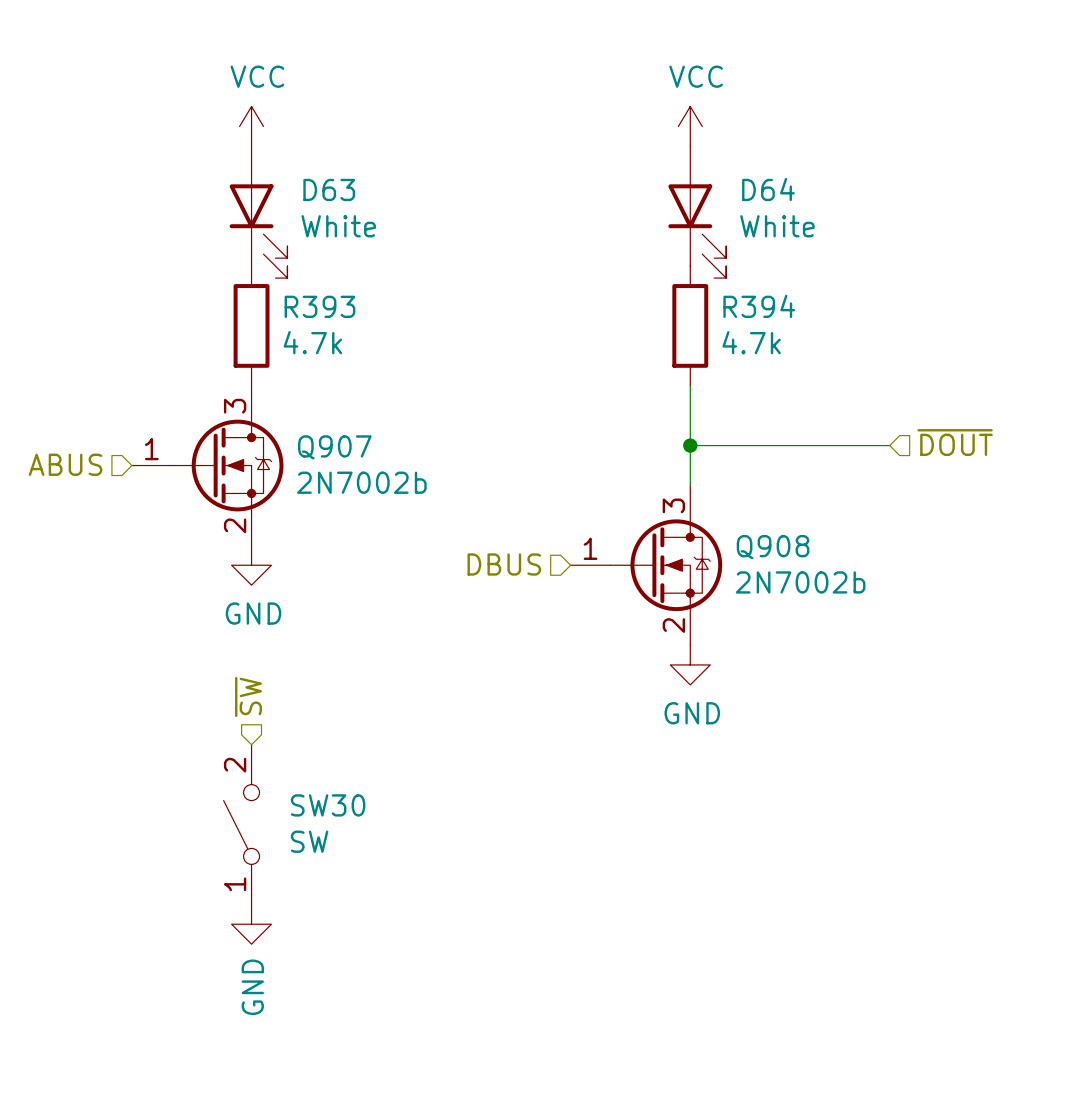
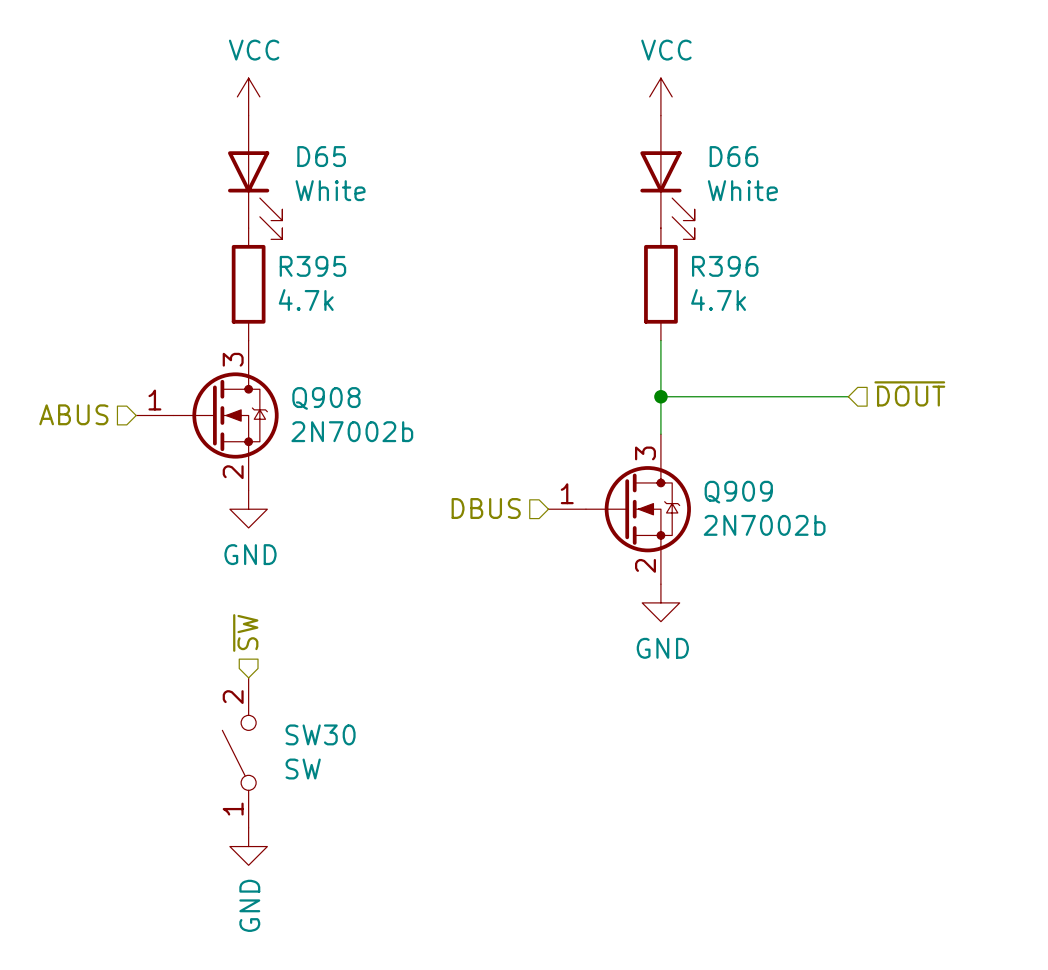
D63 name: D63 (329, 189) -> D65 (321, 156)
D64 name: D64 (768, 189) -> D66 (733, 156)
R393 name: R393 (319, 306) -> R395 (312, 266)
R394 name: R394 (759, 306) -> R396 (725, 266)
Q907 name: Q907 (334, 447) -> Q908 (326, 398)
Q908 name: Q908 (773, 547) -> Q909 (738, 492)

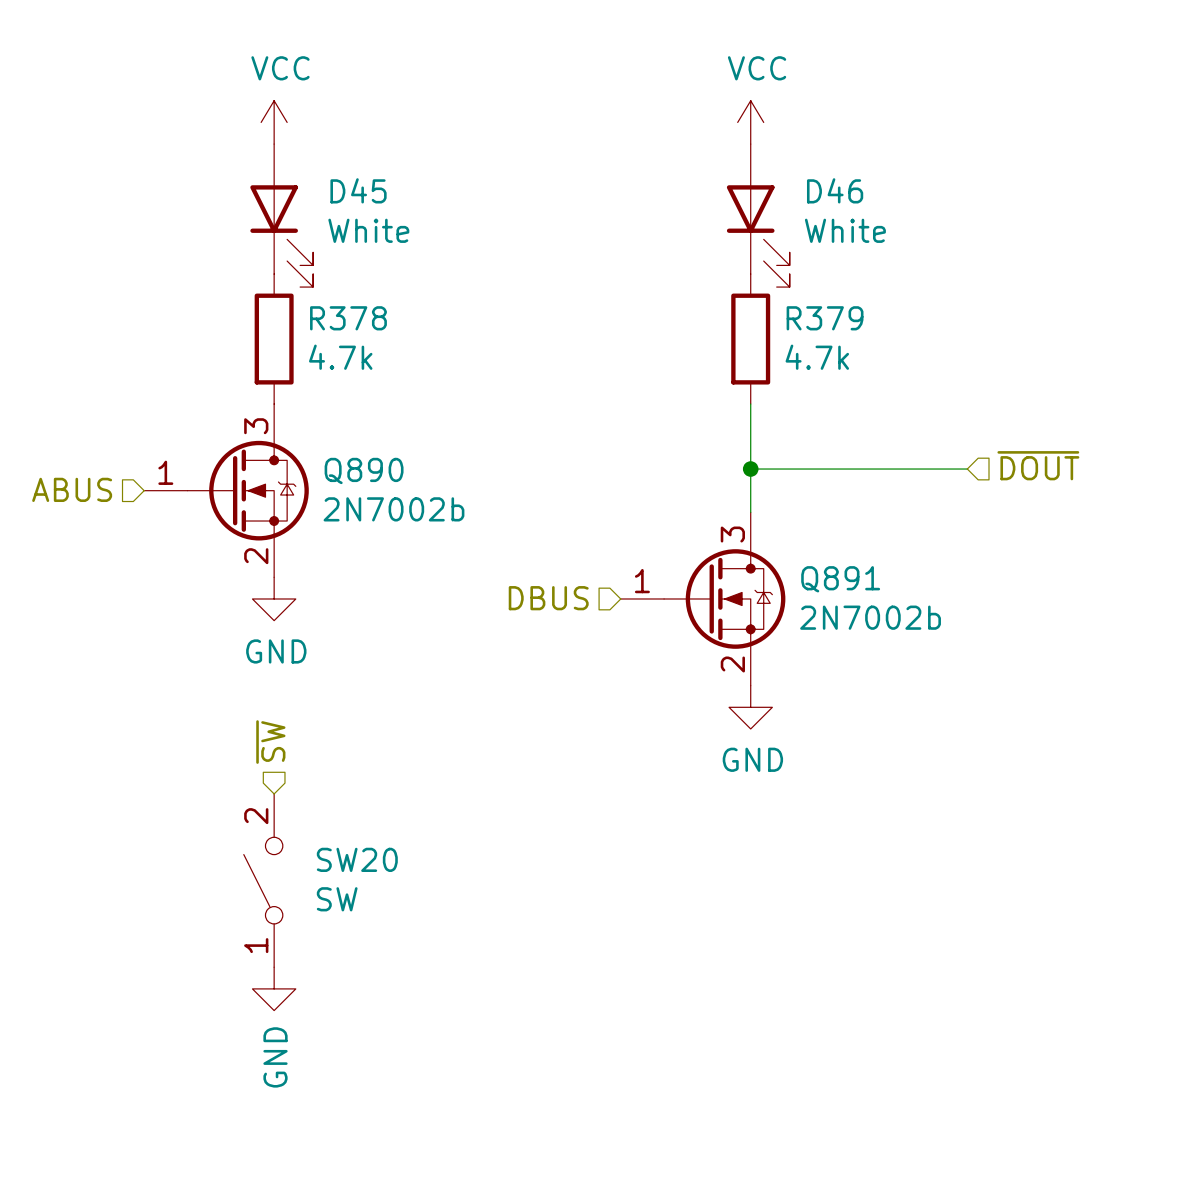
D65 name: D65 (321, 156) -> D45 (358, 190)
D66 name: D66 (733, 156) -> D46 (835, 190)
R395 name: R395 (312, 266) -> R378 (348, 318)
R396 name: R396 (725, 266) -> R379 (825, 318)
Q908 name: Q908 (326, 398) -> Q890 (364, 470)
Q909 name: Q909 (738, 492) -> Q891 (840, 579)
SW30 name: SW30 (320, 734) -> SW20 (357, 859)

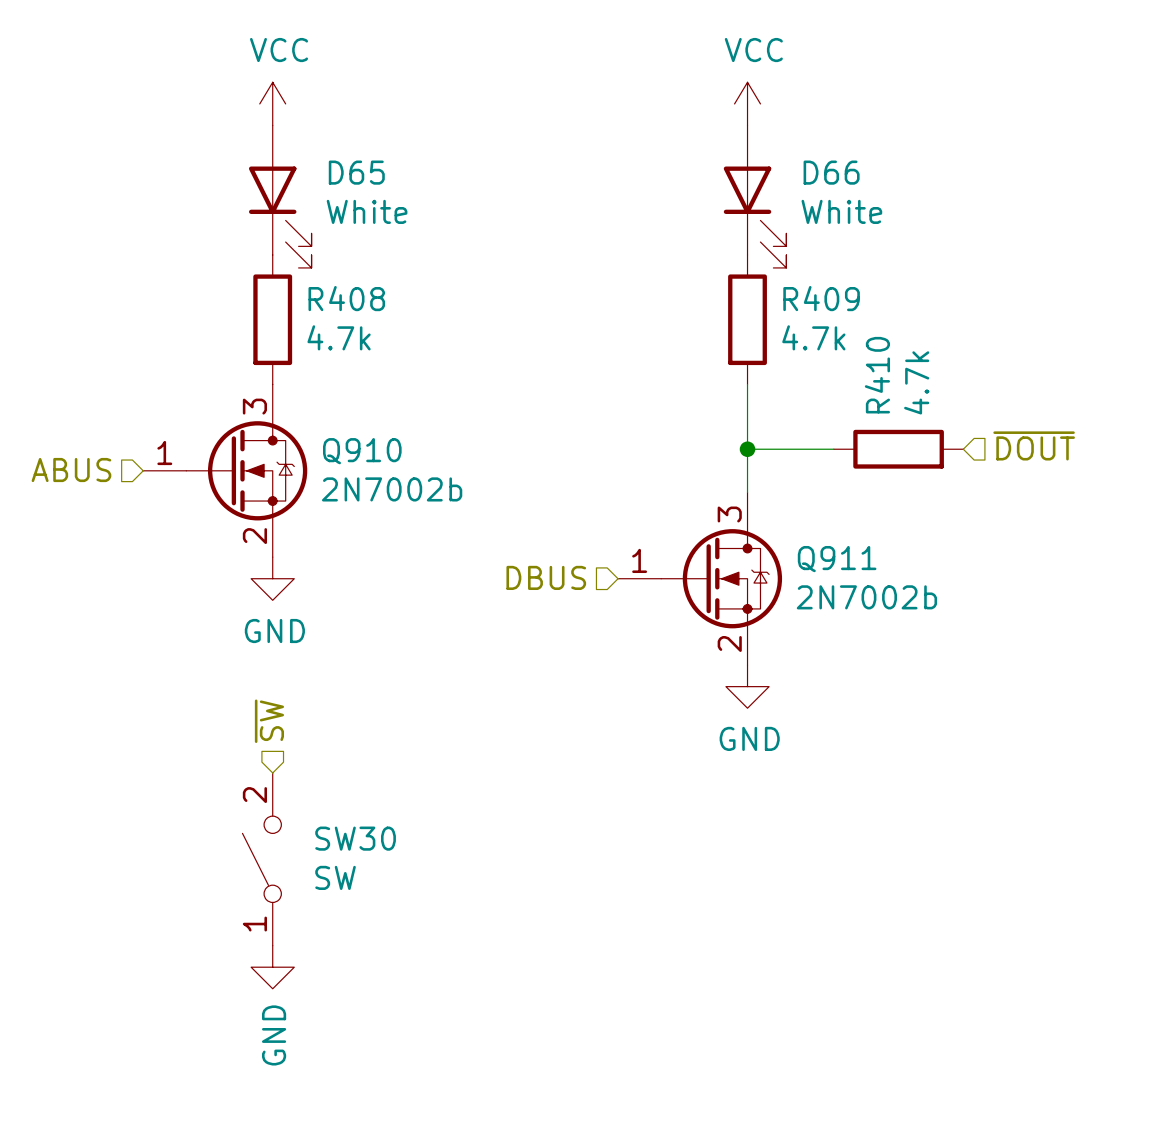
D45 name: D45 (358, 190) -> D65 (356, 172)
D46 name: D46 (835, 190) -> D66 (831, 172)
R378 name: R378 (348, 318) -> R408 (346, 298)
R379 name: R379 (825, 318) -> R409 (821, 298)
wire: (837, 469) (967, 469) -> none
R410: none -> 4.7k (898, 449)
Q890 name: Q890 (364, 470) -> Q910 (362, 451)
Q891 name: Q891 (840, 579) -> Q911 (837, 559)
SW20 name: SW20 (357, 859) -> SW30 (355, 838)

